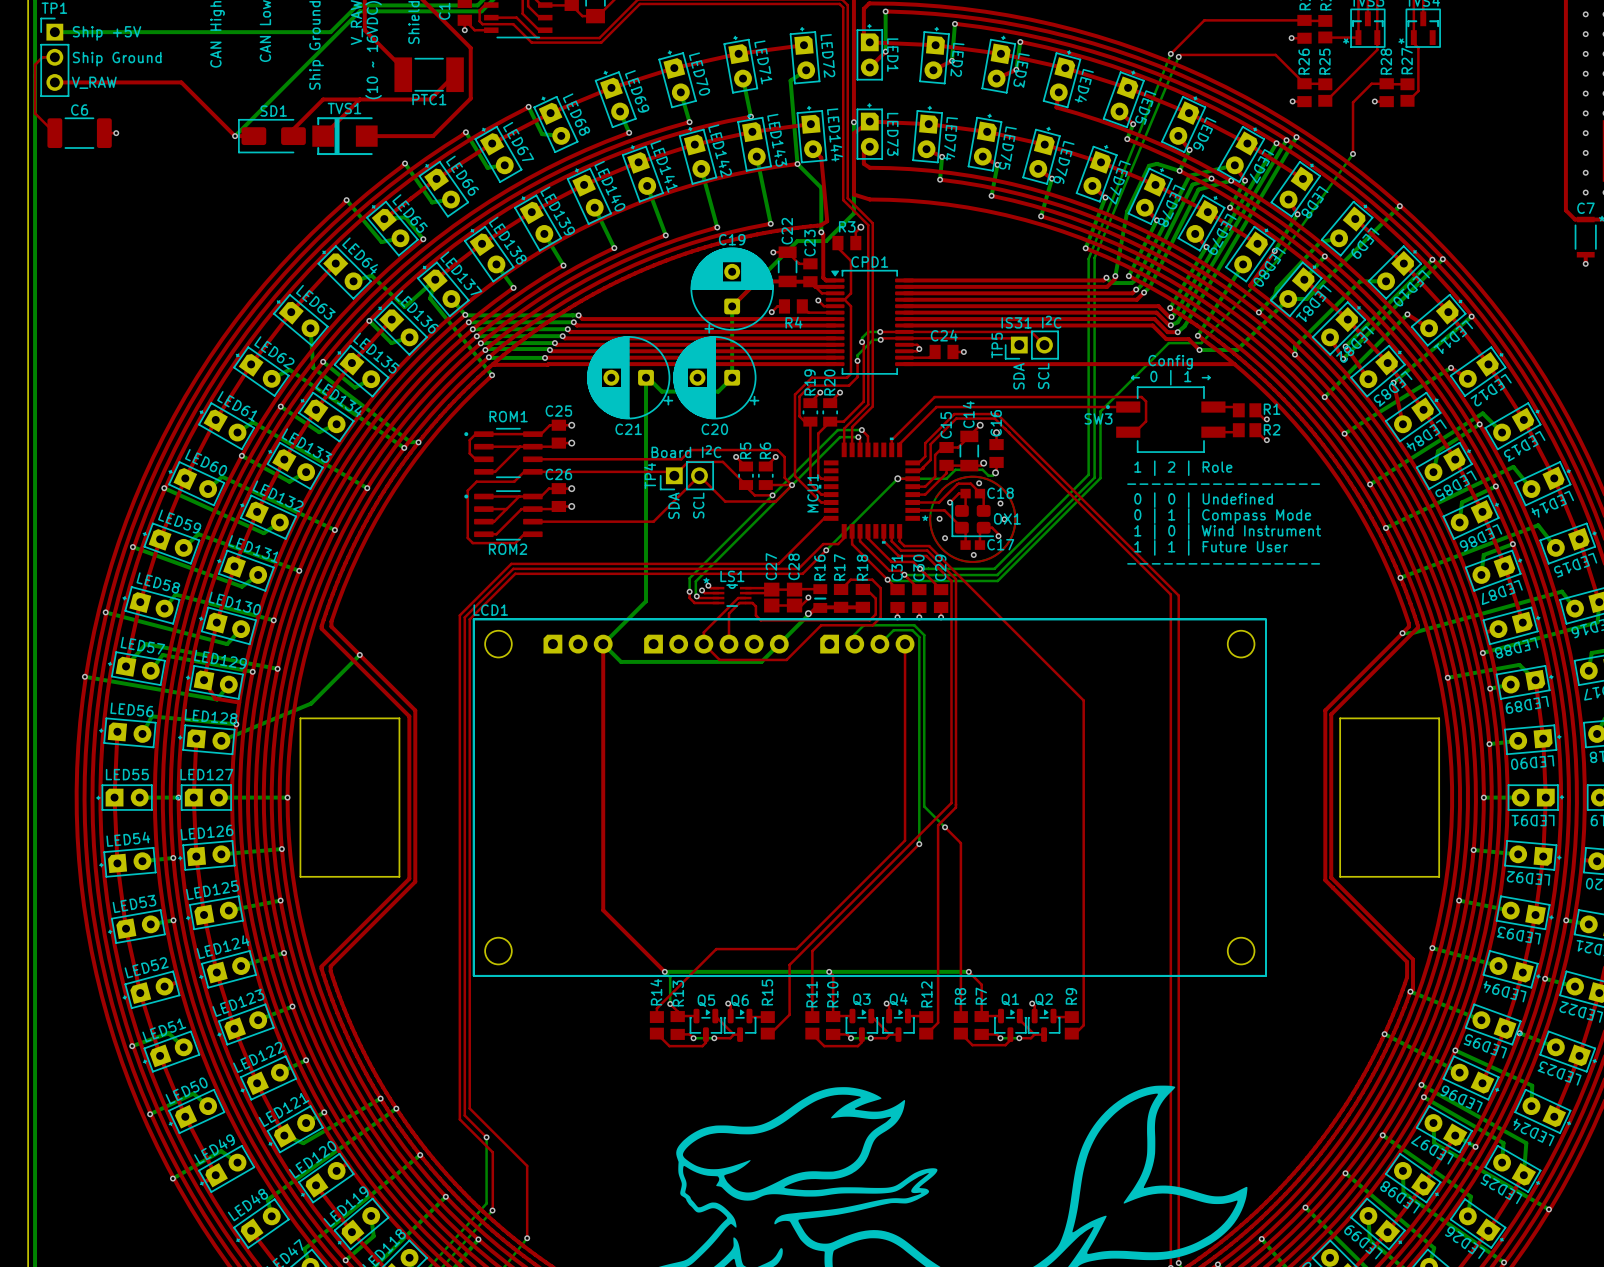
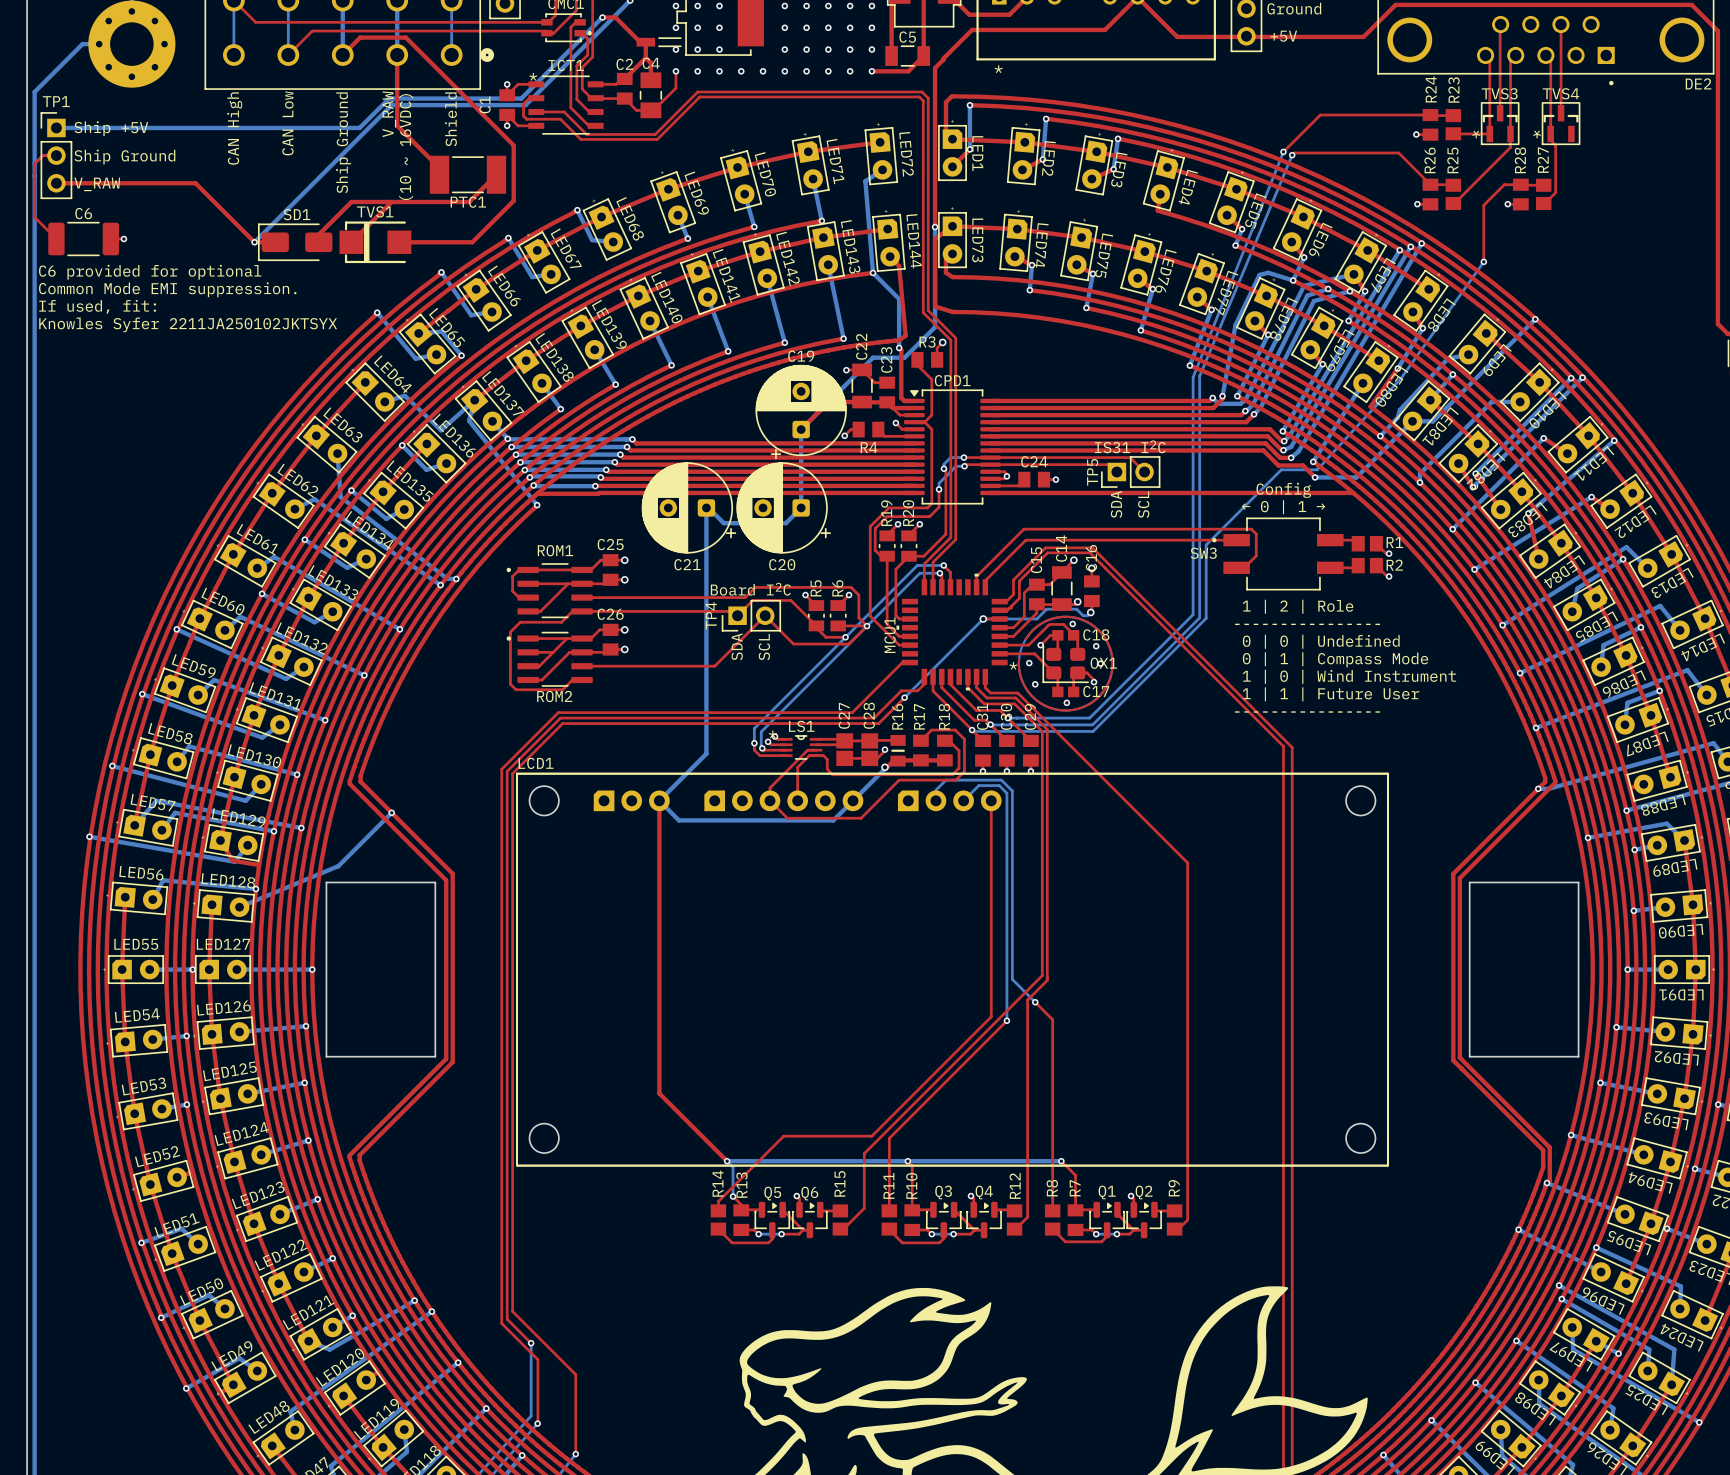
text: none -> C6 provided for optional (150, 272)
text: none -> Common Mode EMI suppression. (167, 289)
text: none -> If used, fit: (97, 306)
text: none -> Knowles Syfer 2211JA250102JKTSYX (188, 324)

